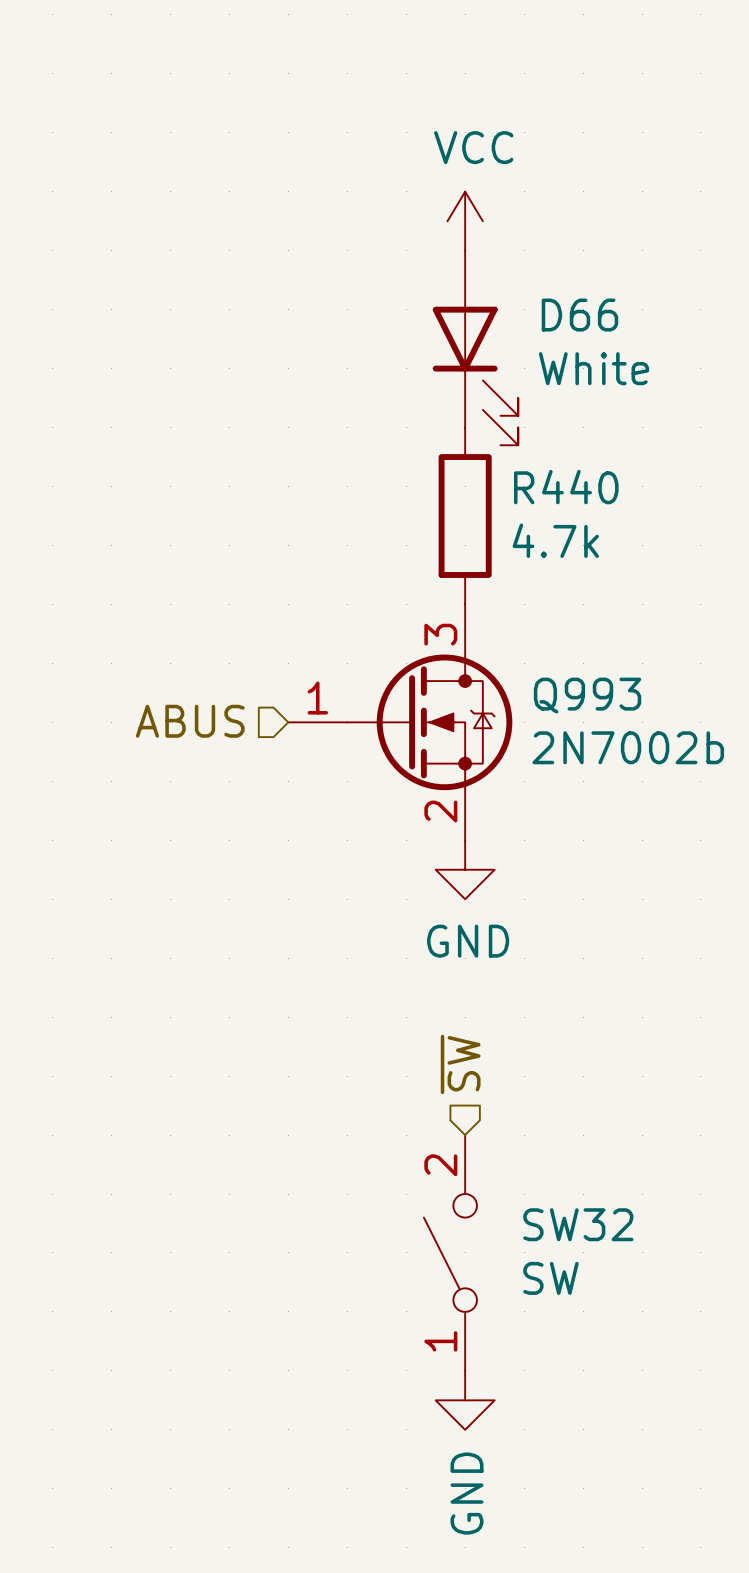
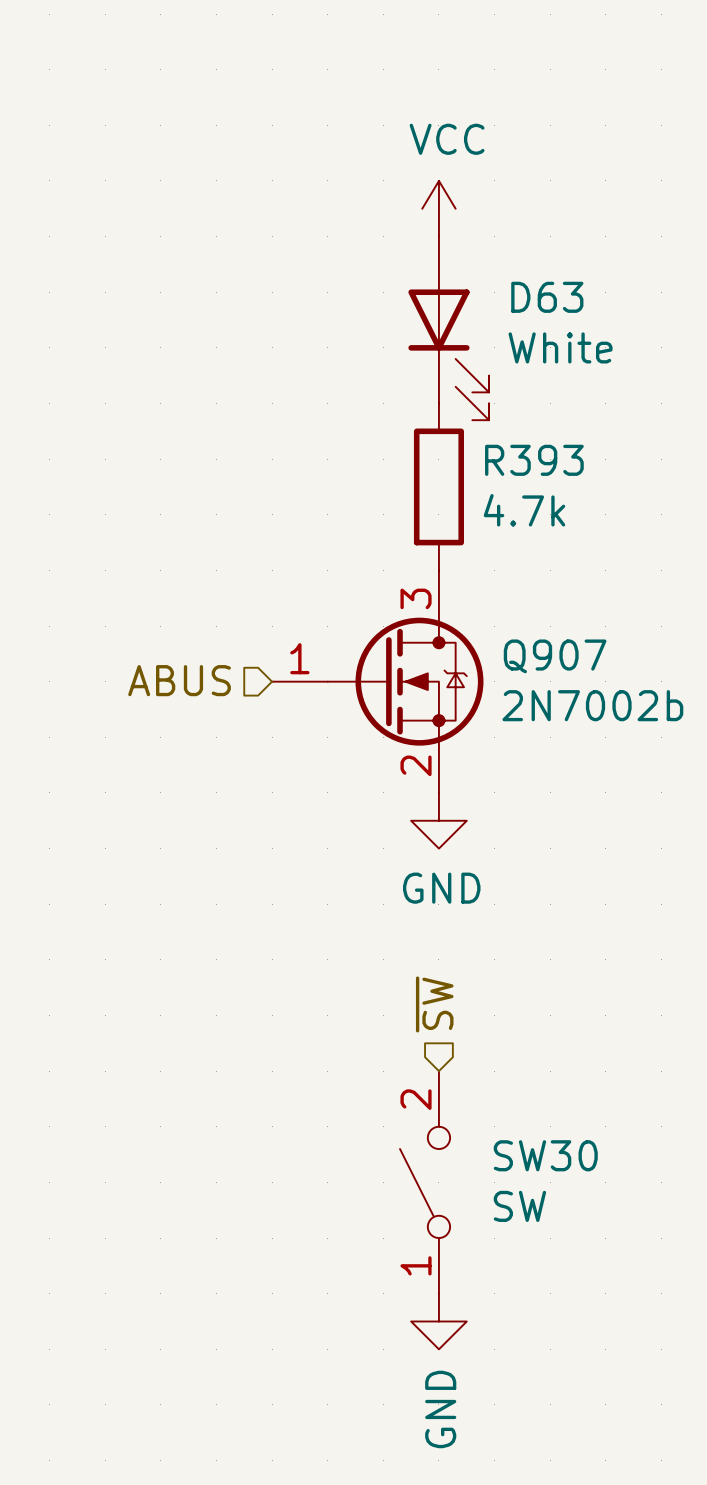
D66 name: D66 (579, 315) -> D63 (547, 297)
R440 name: R440 (566, 487) -> R393 (534, 460)
Q993 name: Q993 (587, 695) -> Q907 (555, 656)
SW32 name: SW32 (578, 1224) -> SW30 (545, 1155)

